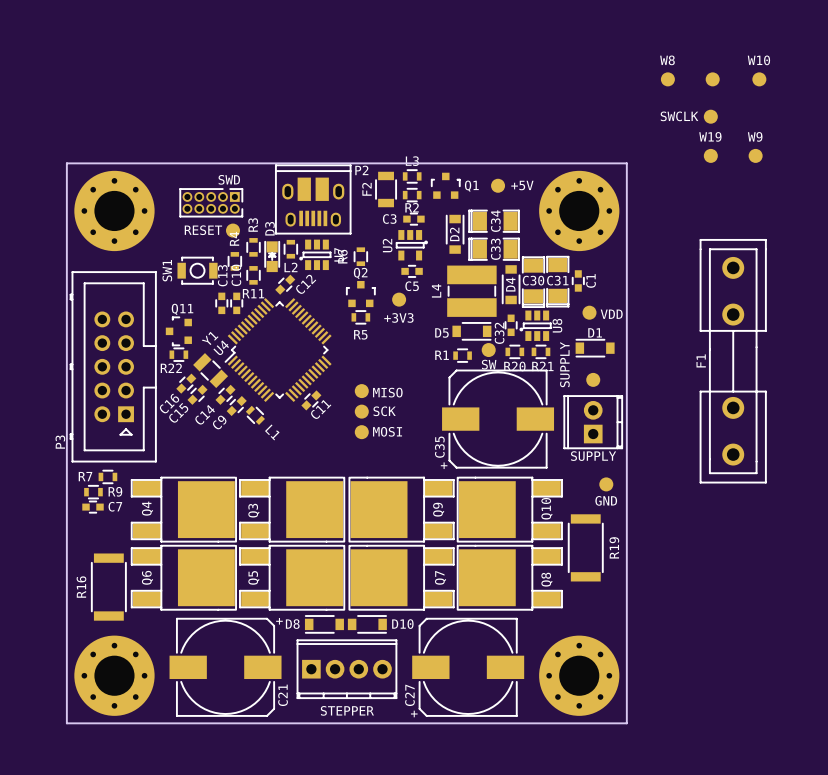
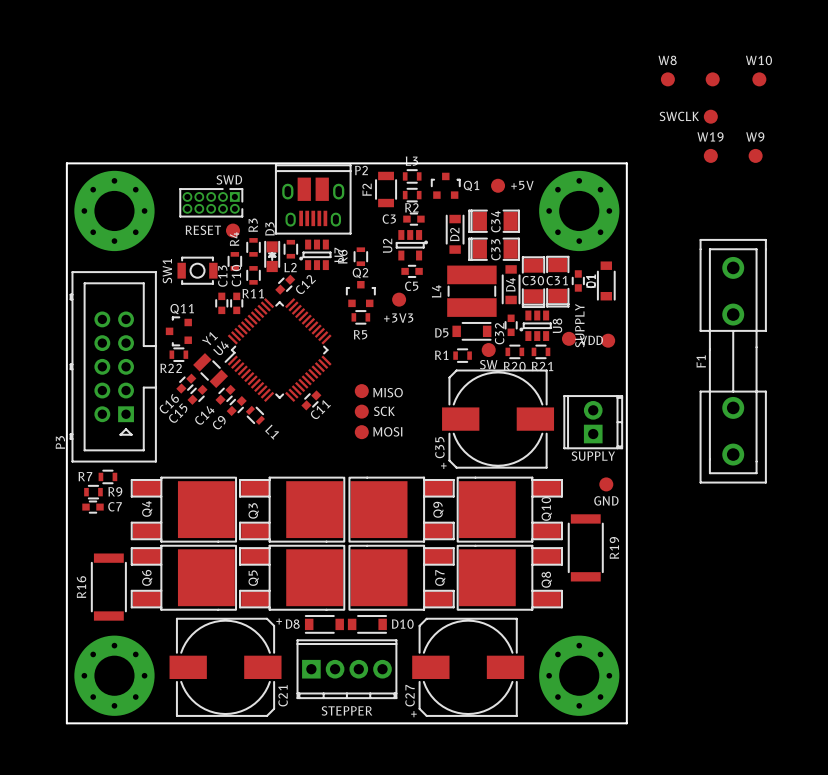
part position: (589, 312) -> (568, 338)
D1 rotation: 0° (595, 348) -> 90° counterclockwise (606, 280)
D1 position: (595, 348) -> (606, 280)
part position: (593, 379) -> (608, 340)

